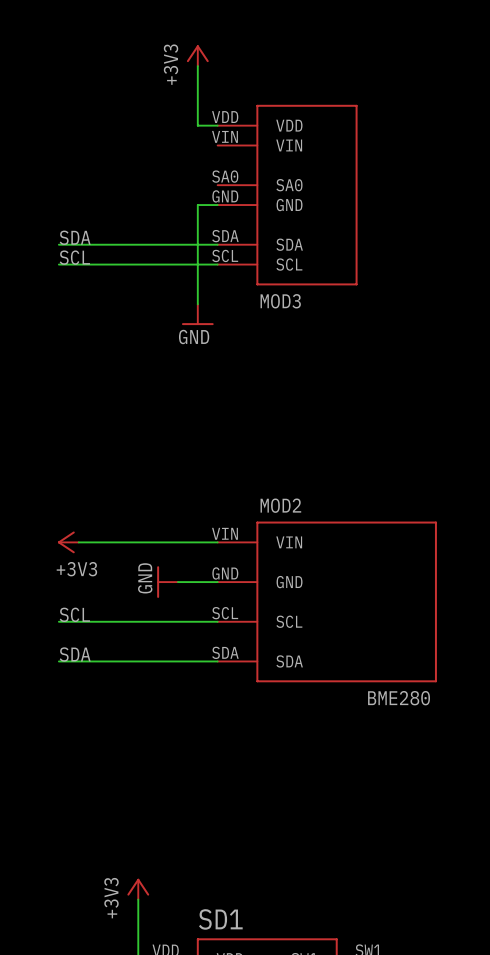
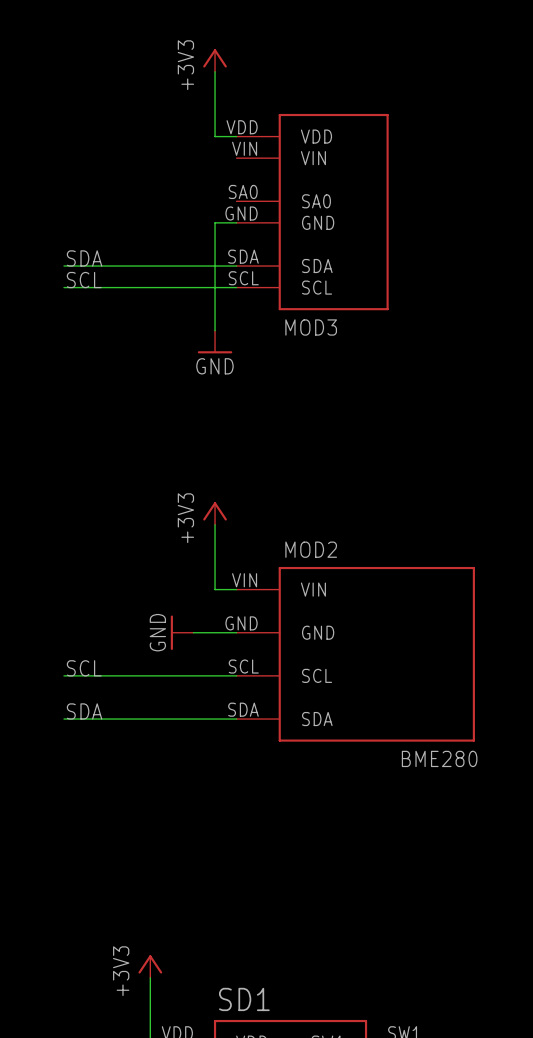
power symbol rotation: 0° (66, 542) -> 90° clockwise (215, 511)
power symbol position: +3V3 (68, 542) -> +3V3 (215, 513)
wire: (78, 542) (197, 542) -> (215, 524) (215, 589)

